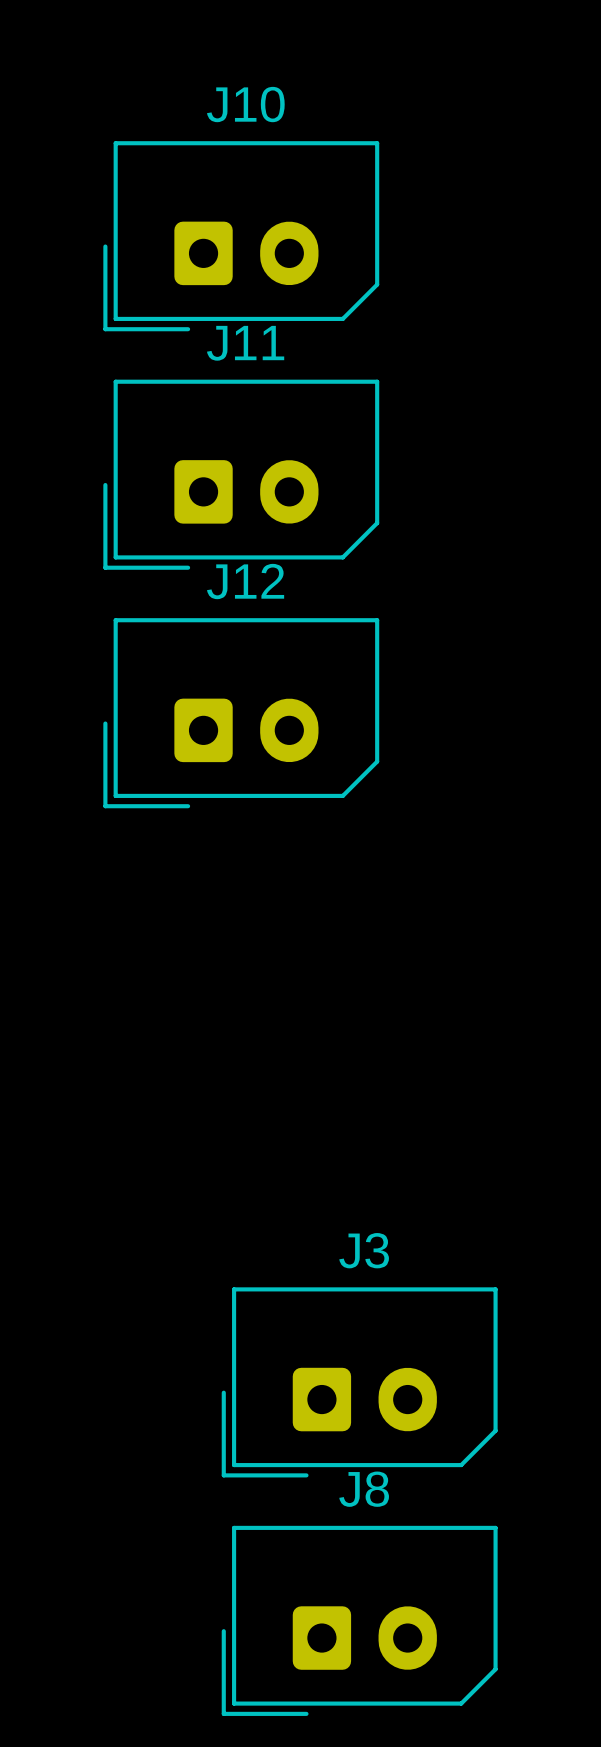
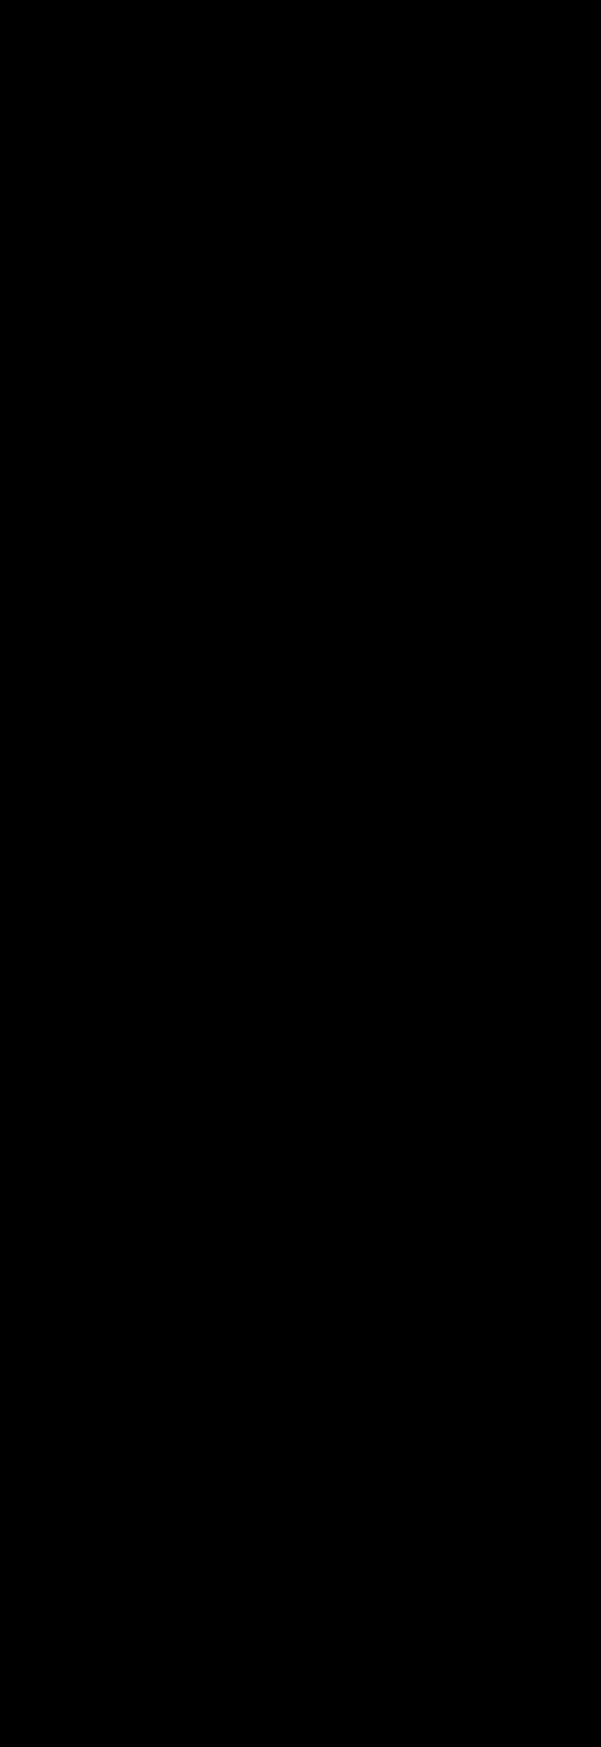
J10: (241, 236) -> none
J11: (241, 474) -> none
J12: (241, 713) -> none
J3: (359, 1382) -> none
J8: (359, 1620) -> none

